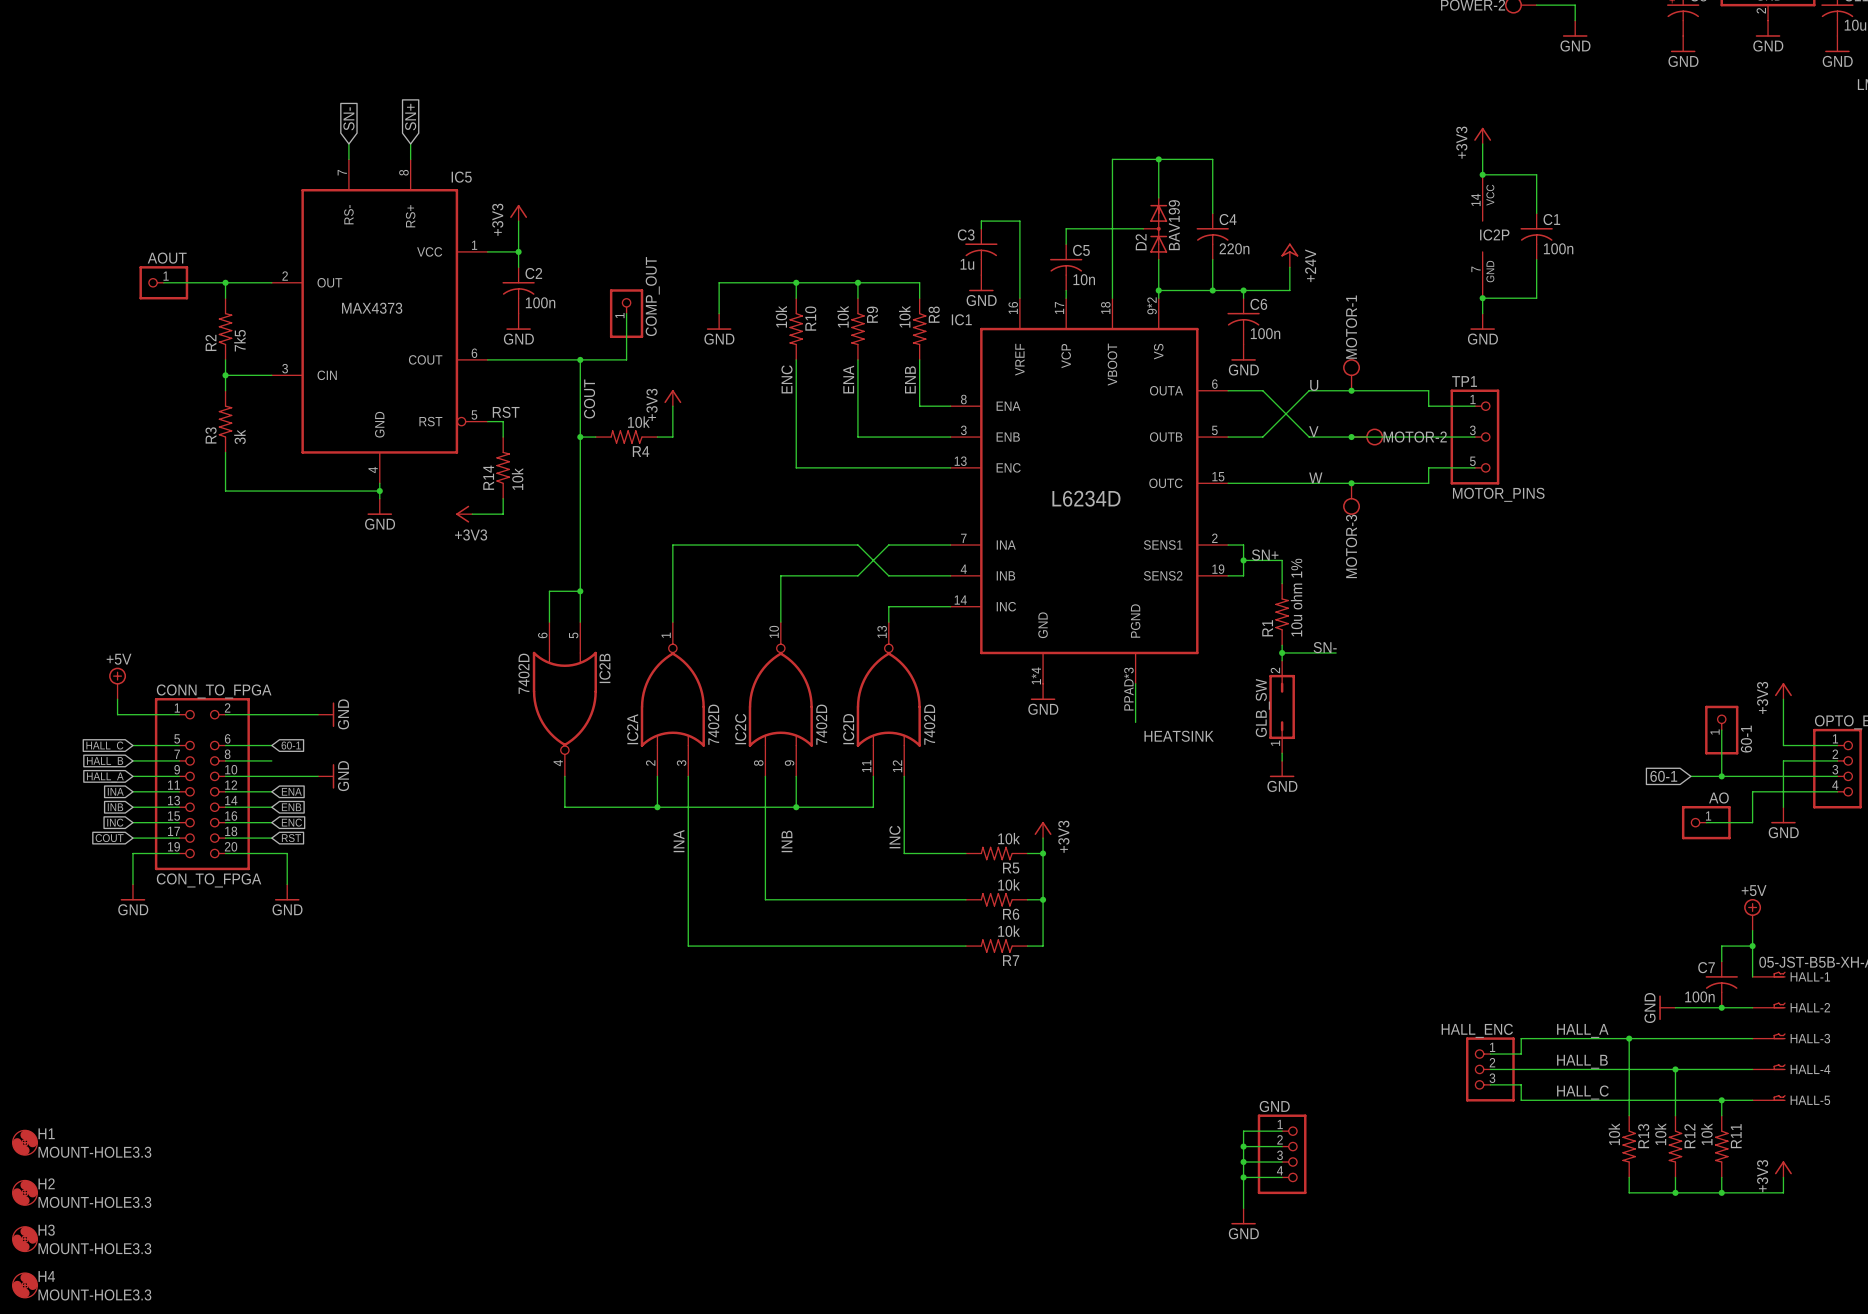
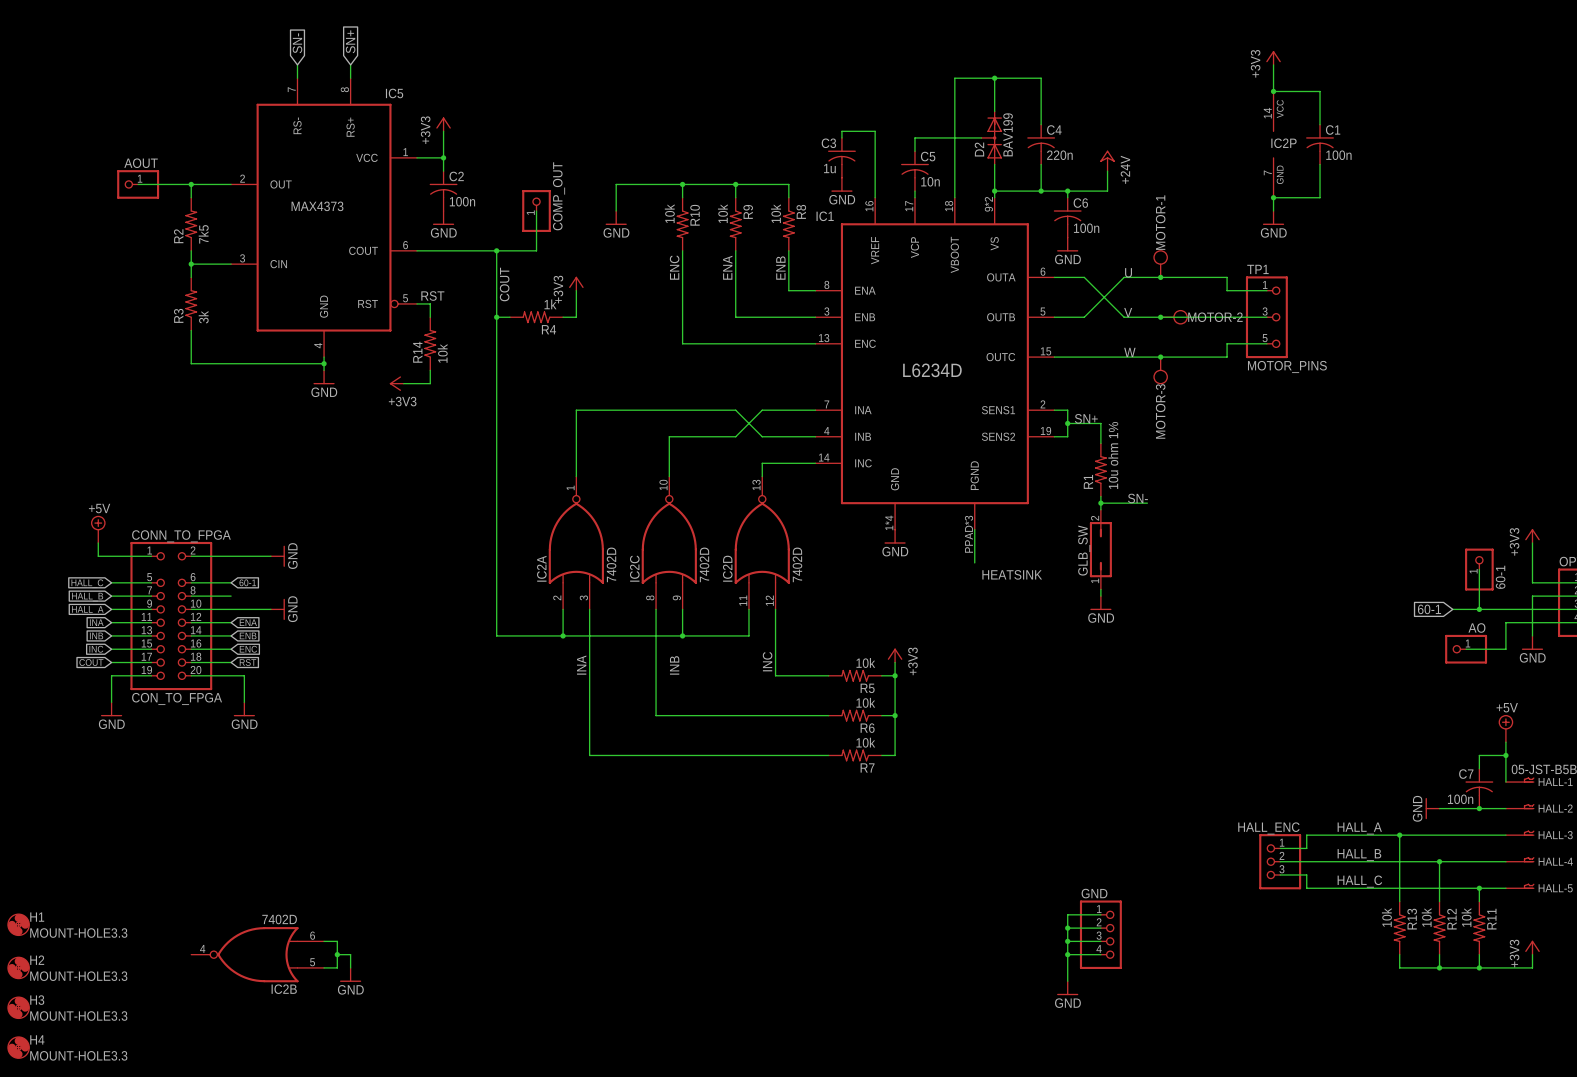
R4 value: 10k (638, 422) -> 1k (550, 304)
wire: (580, 591) (549, 591) (549, 622) -> none
junction: (580, 591) -> none
IC2B rotation: 0° (564, 699) -> 90° clockwise (257, 954)
IC2B position: (564, 699) -> (257, 954)
wire: (564, 776) (564, 807) (580, 807) -> (496, 476) (496, 635)
wire: none -> (324, 941) (337, 941) (337, 967) (324, 967)
wire: none -> (337, 954) (350, 954) (350, 967)
junction: none -> (337, 954)
power symbol: none -> GND (350, 974)

